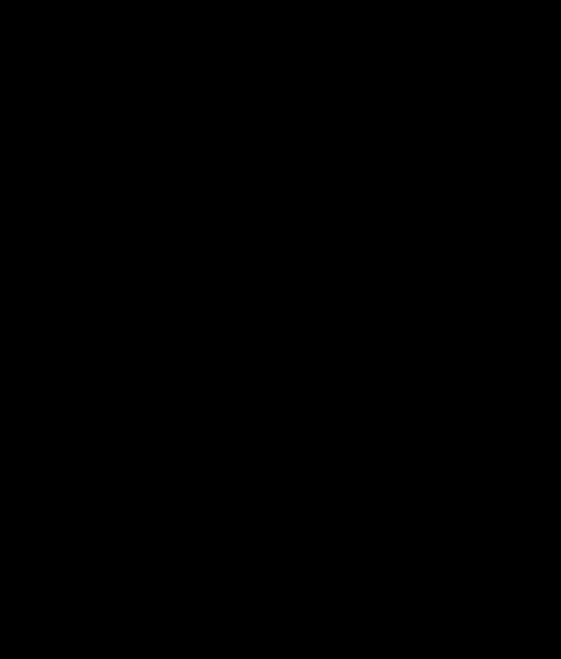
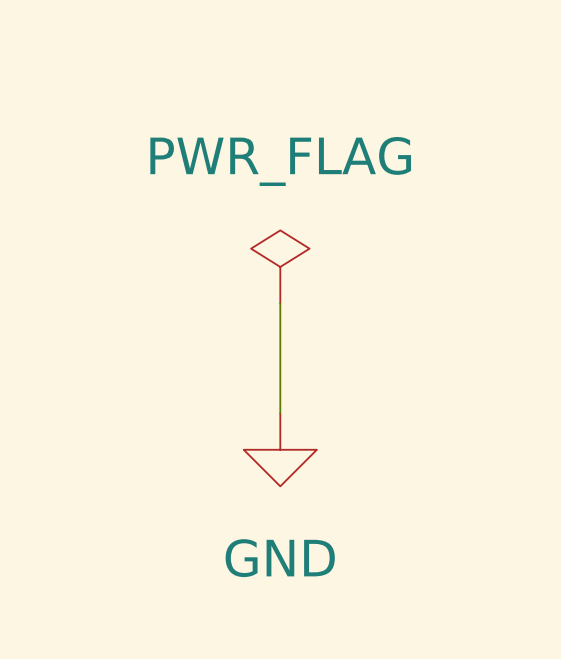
power symbol: none -> PWR_FLAG (280, 266)
wire: none -> (280, 303) (280, 413)
power symbol: none -> GND (280, 449)

